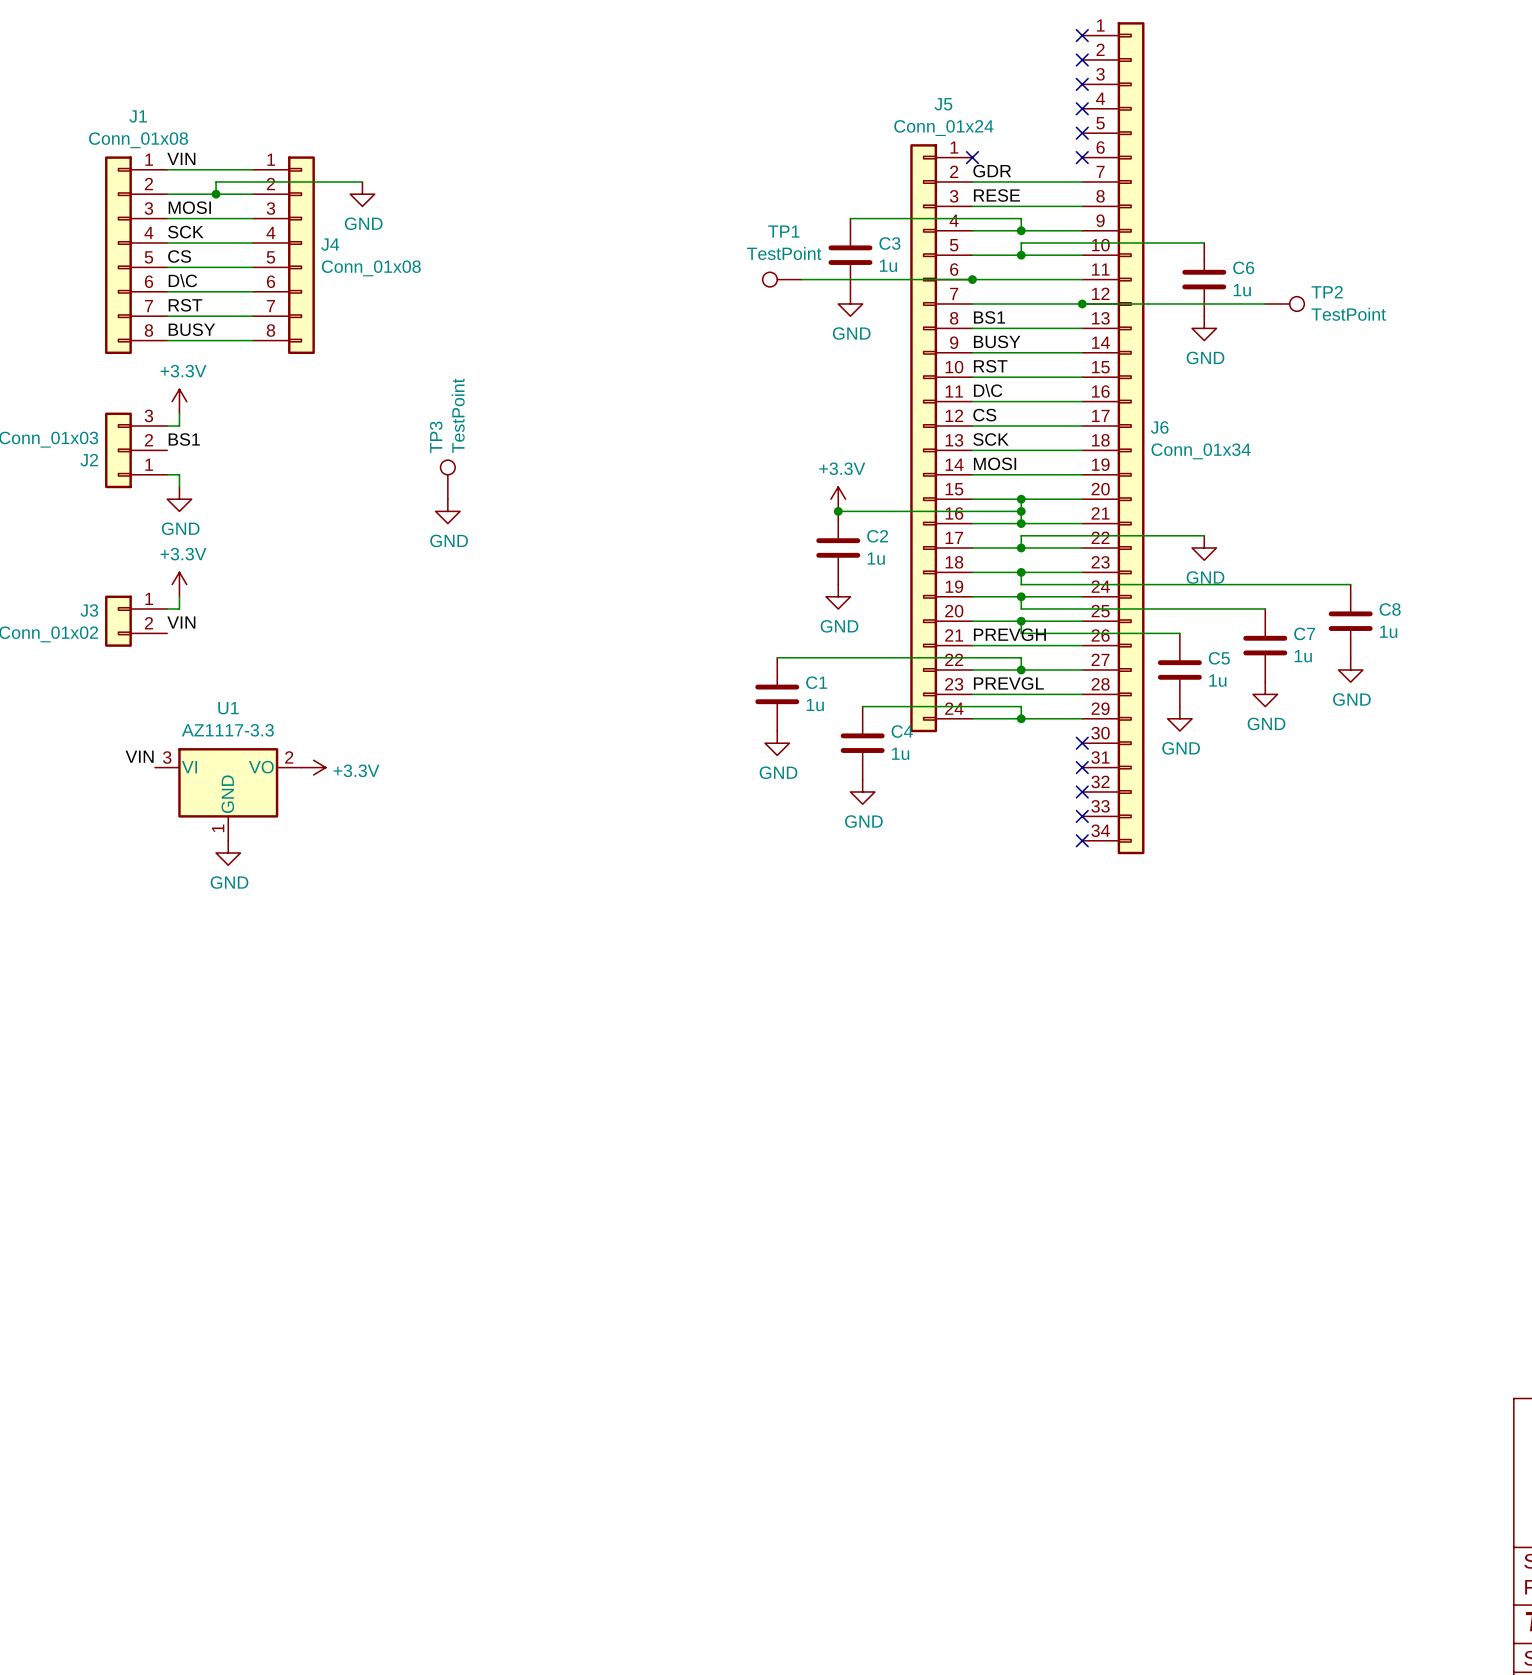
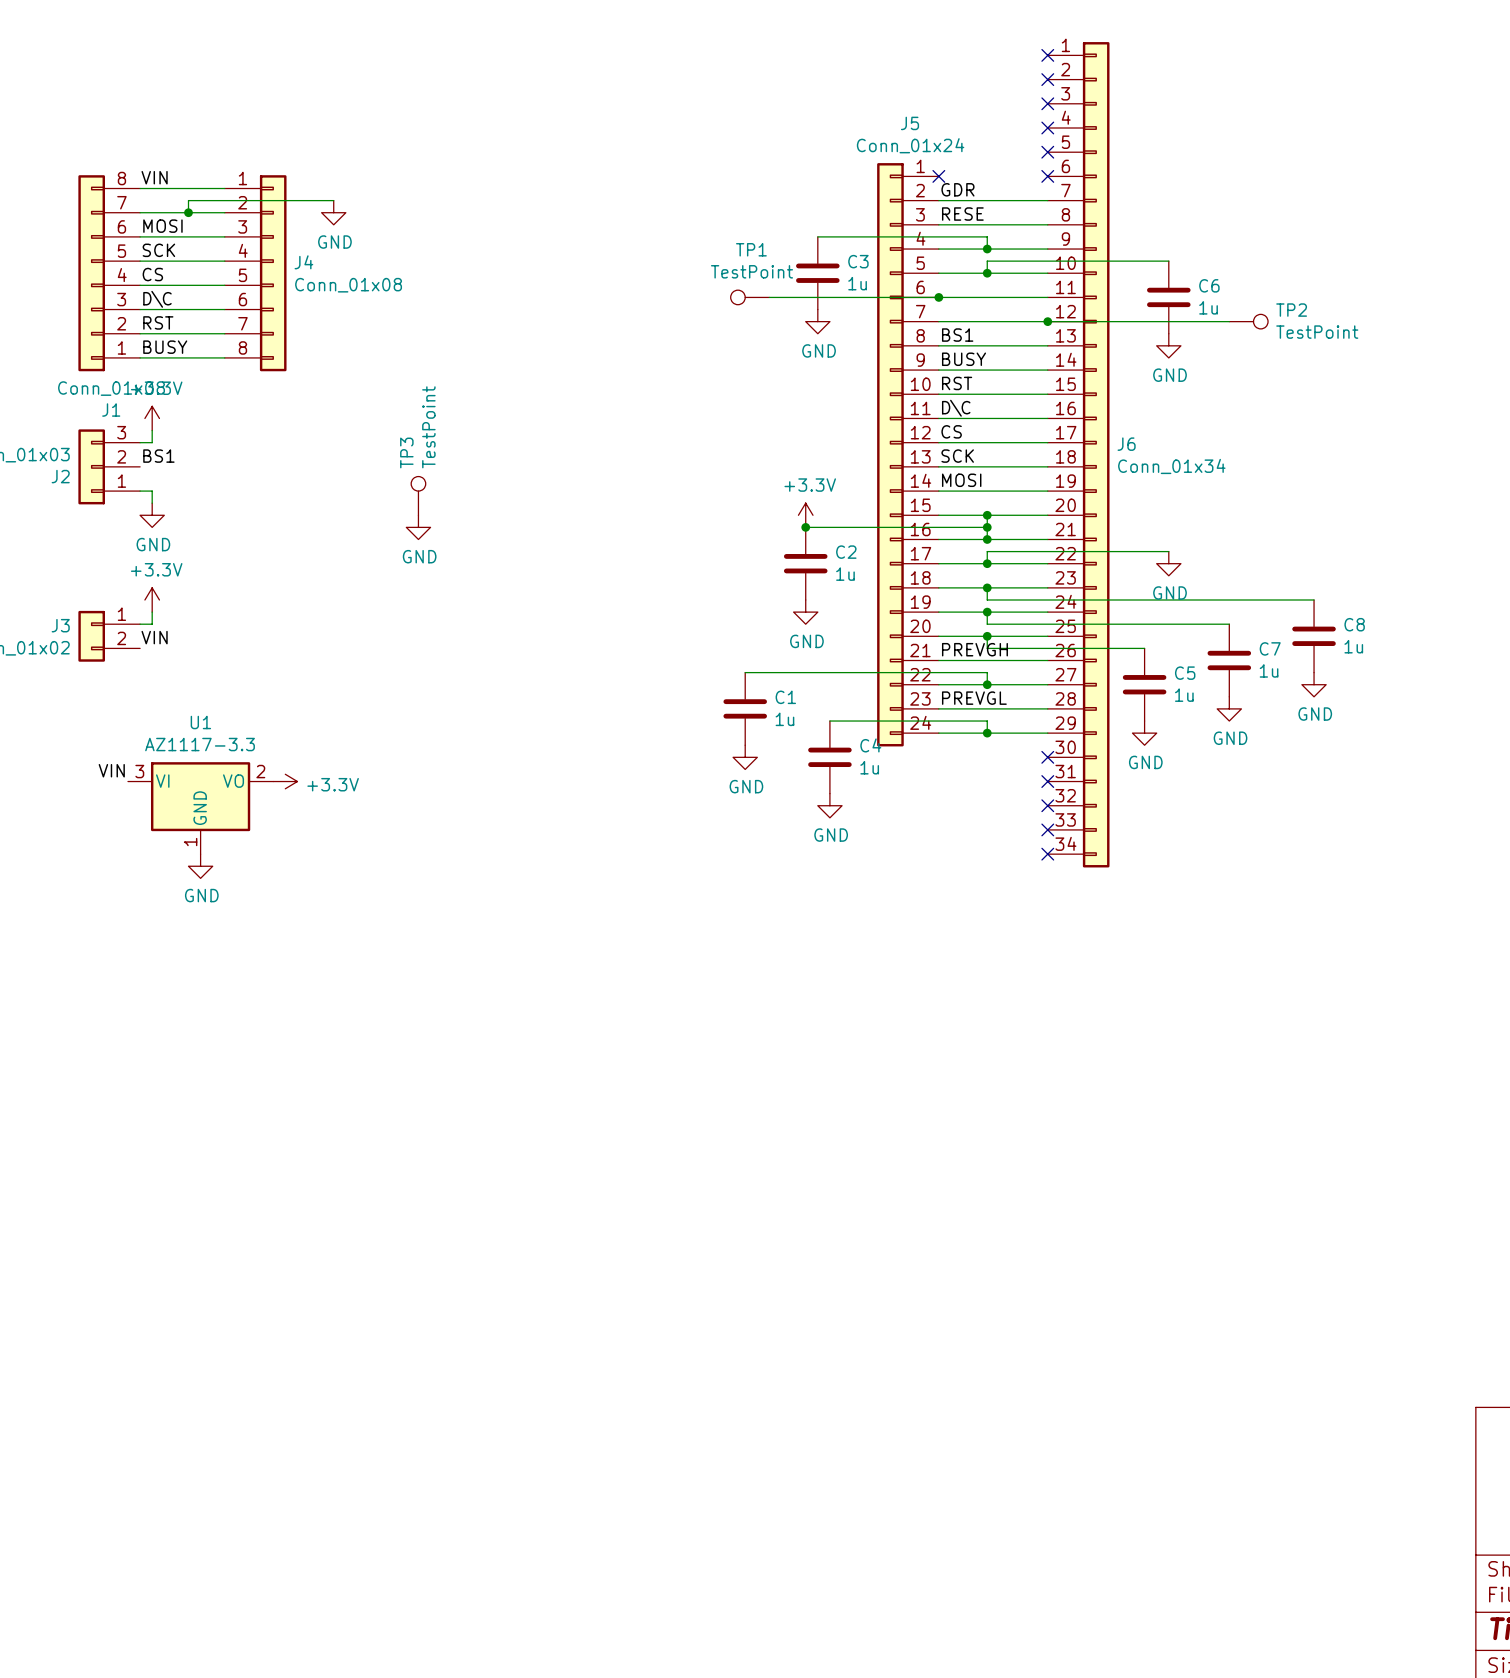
J1 flip: as is (118, 255) -> up-down (91, 273)

